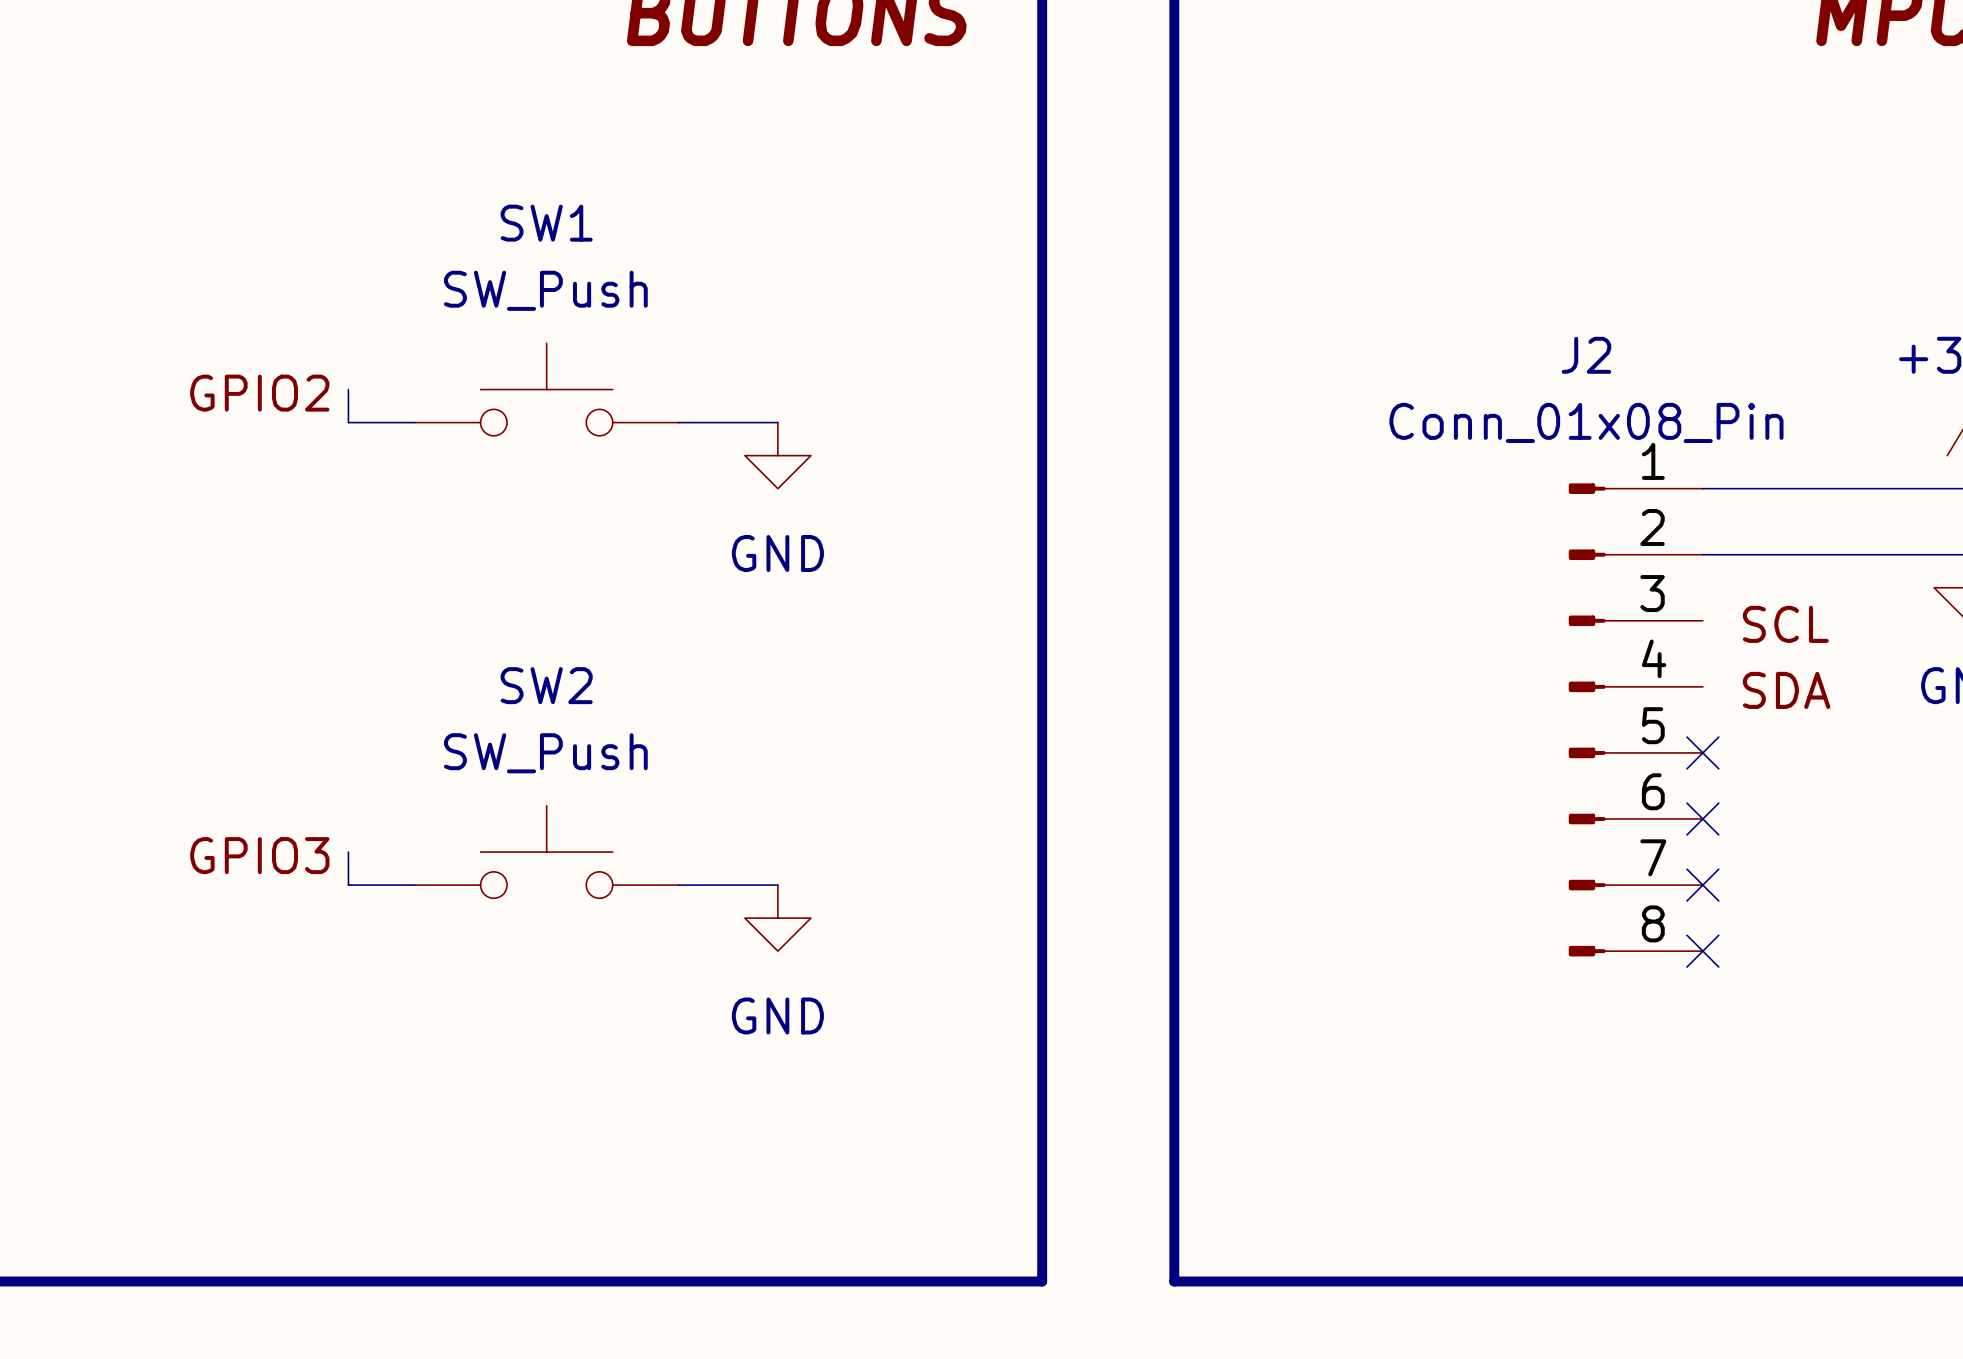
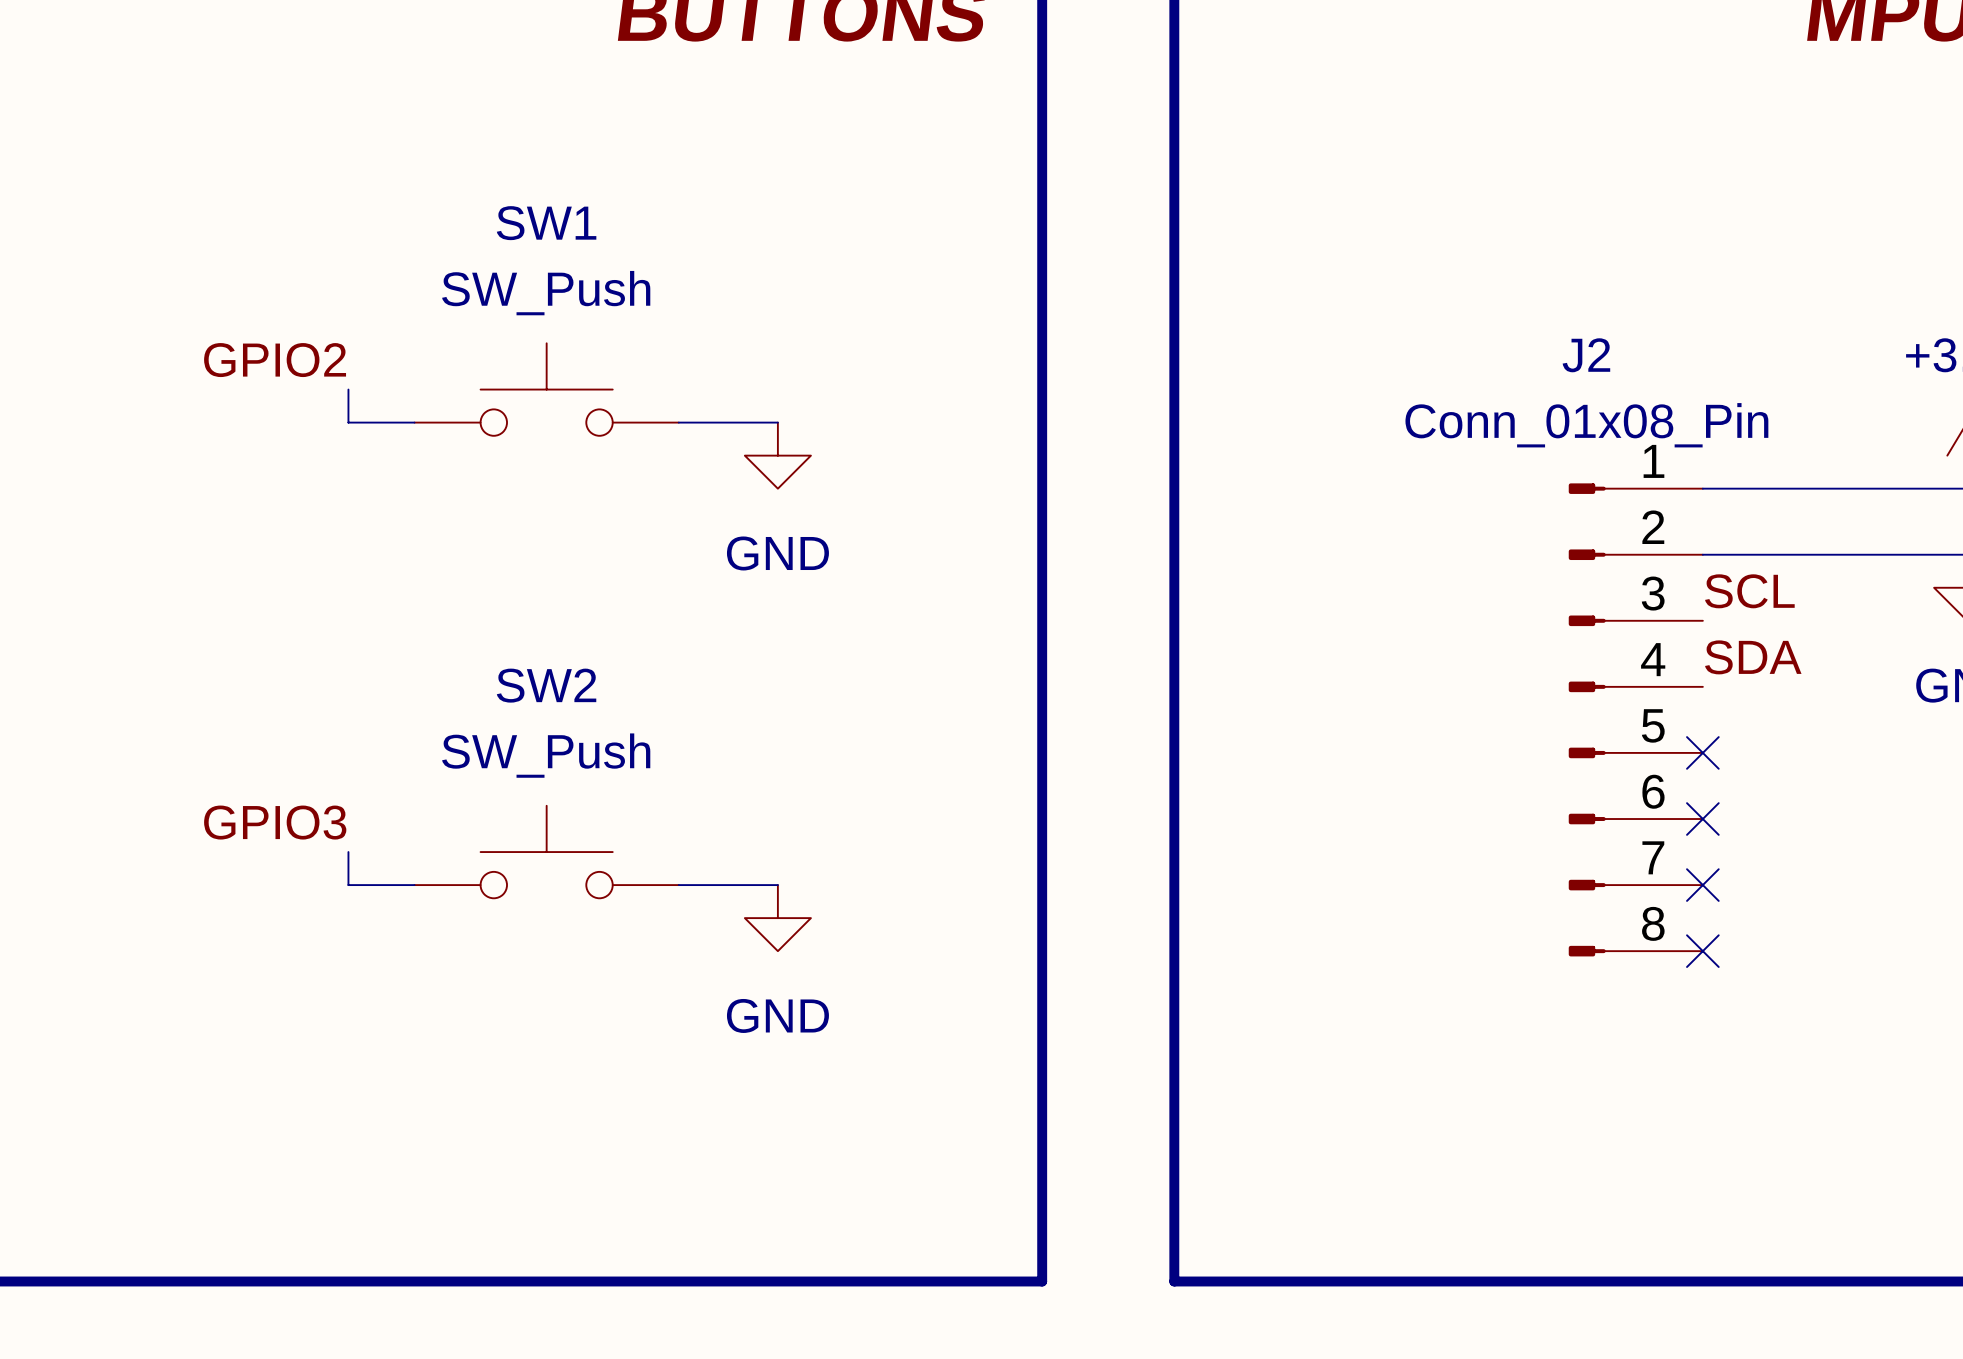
label position: GPIO2 (259, 393) -> GPIO2 (275, 360)
label position: SCL (1785, 624) -> SCL (1749, 591)
label position: SDA (1786, 690) -> SDA (1753, 657)
label position: GPIO3 (259, 855) -> GPIO3 (275, 822)

